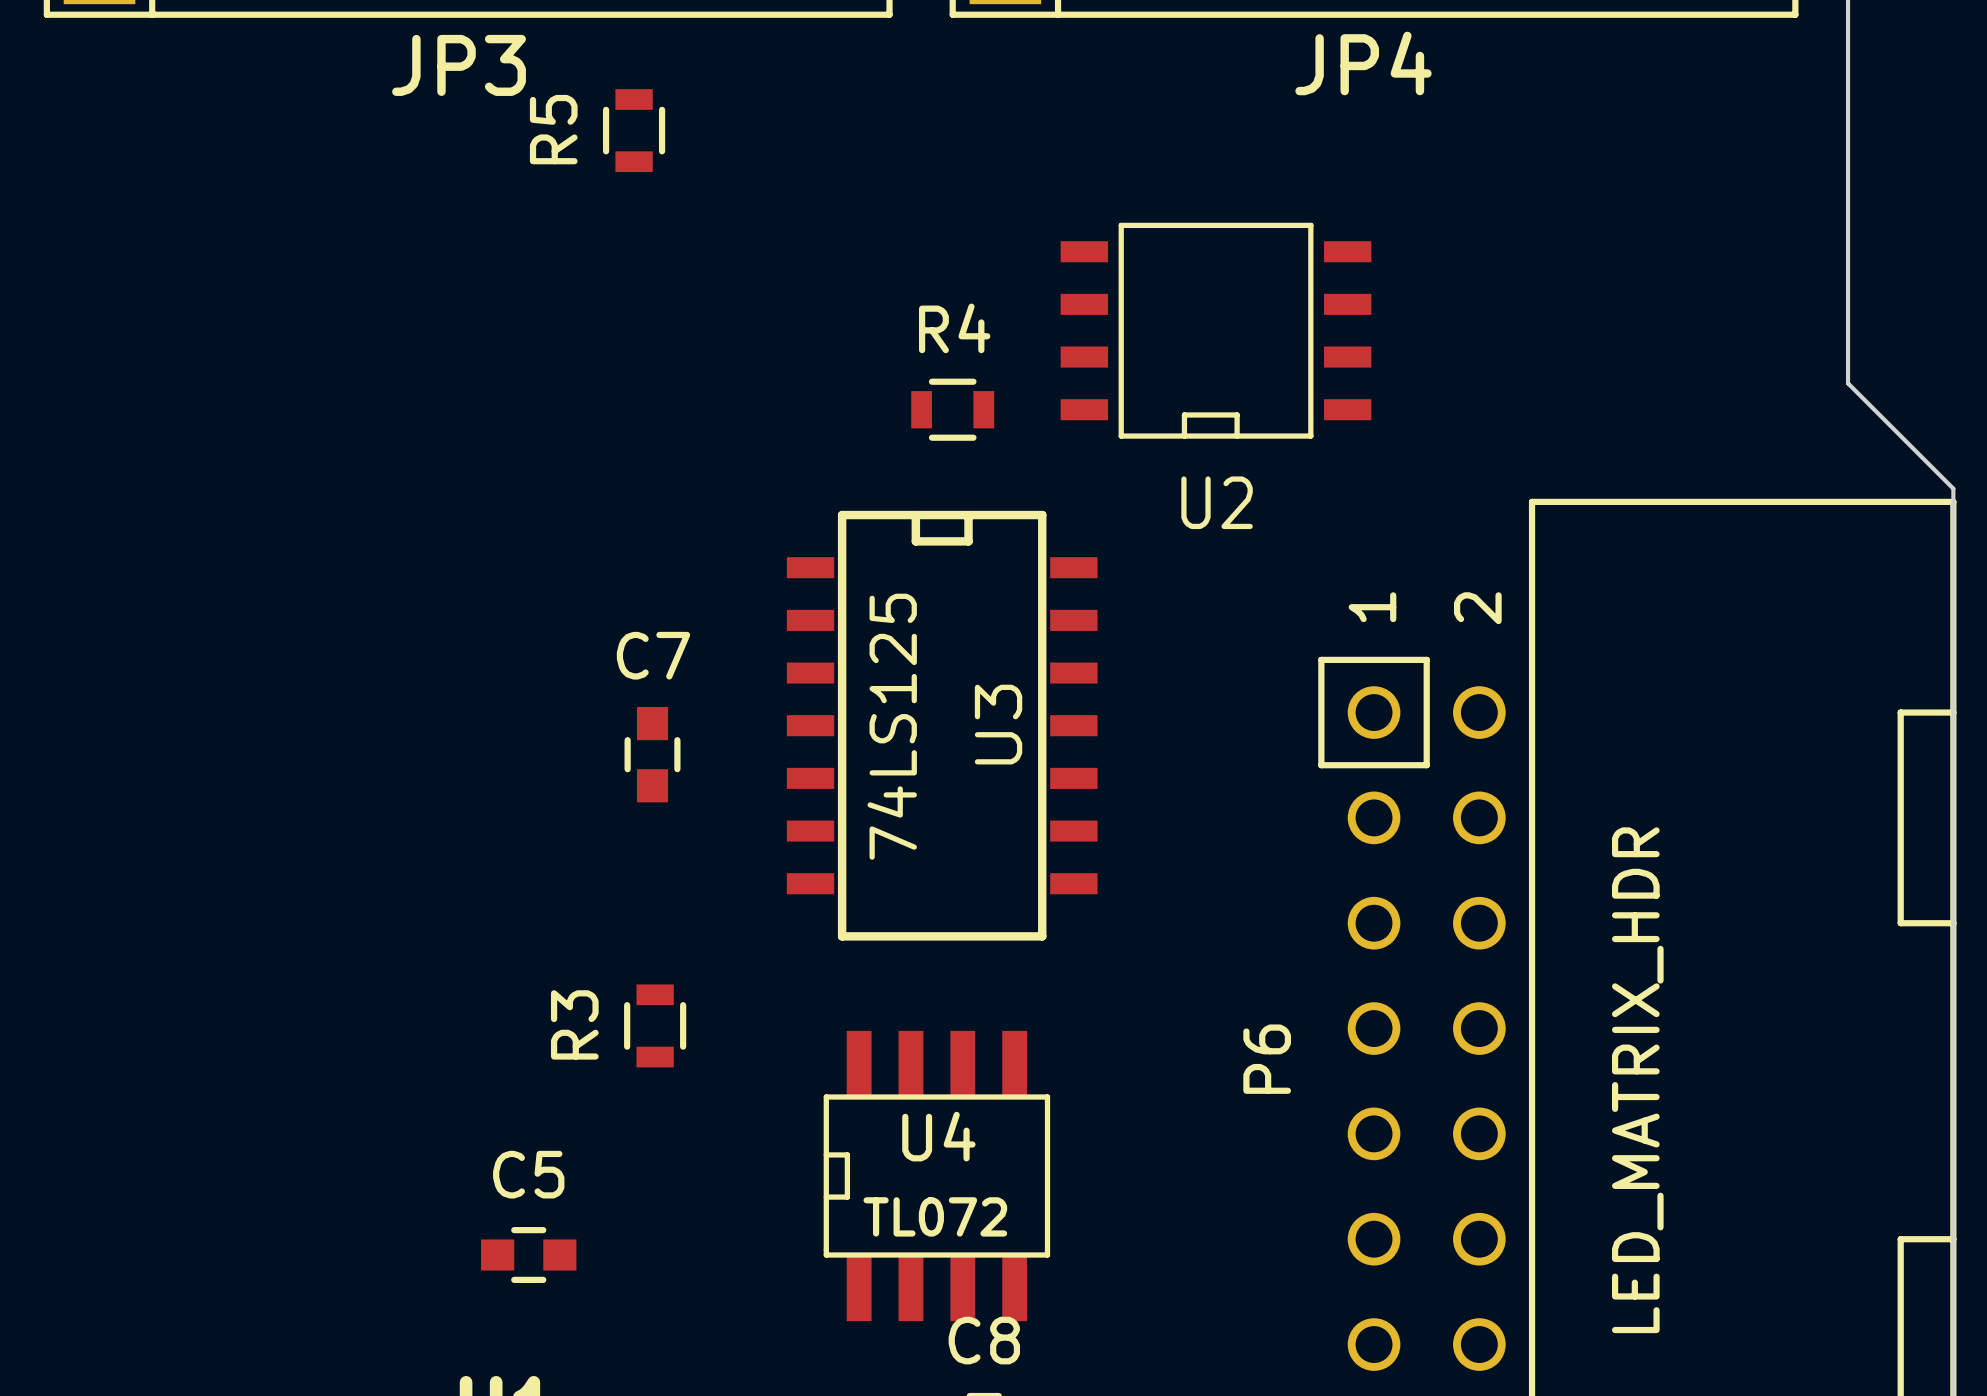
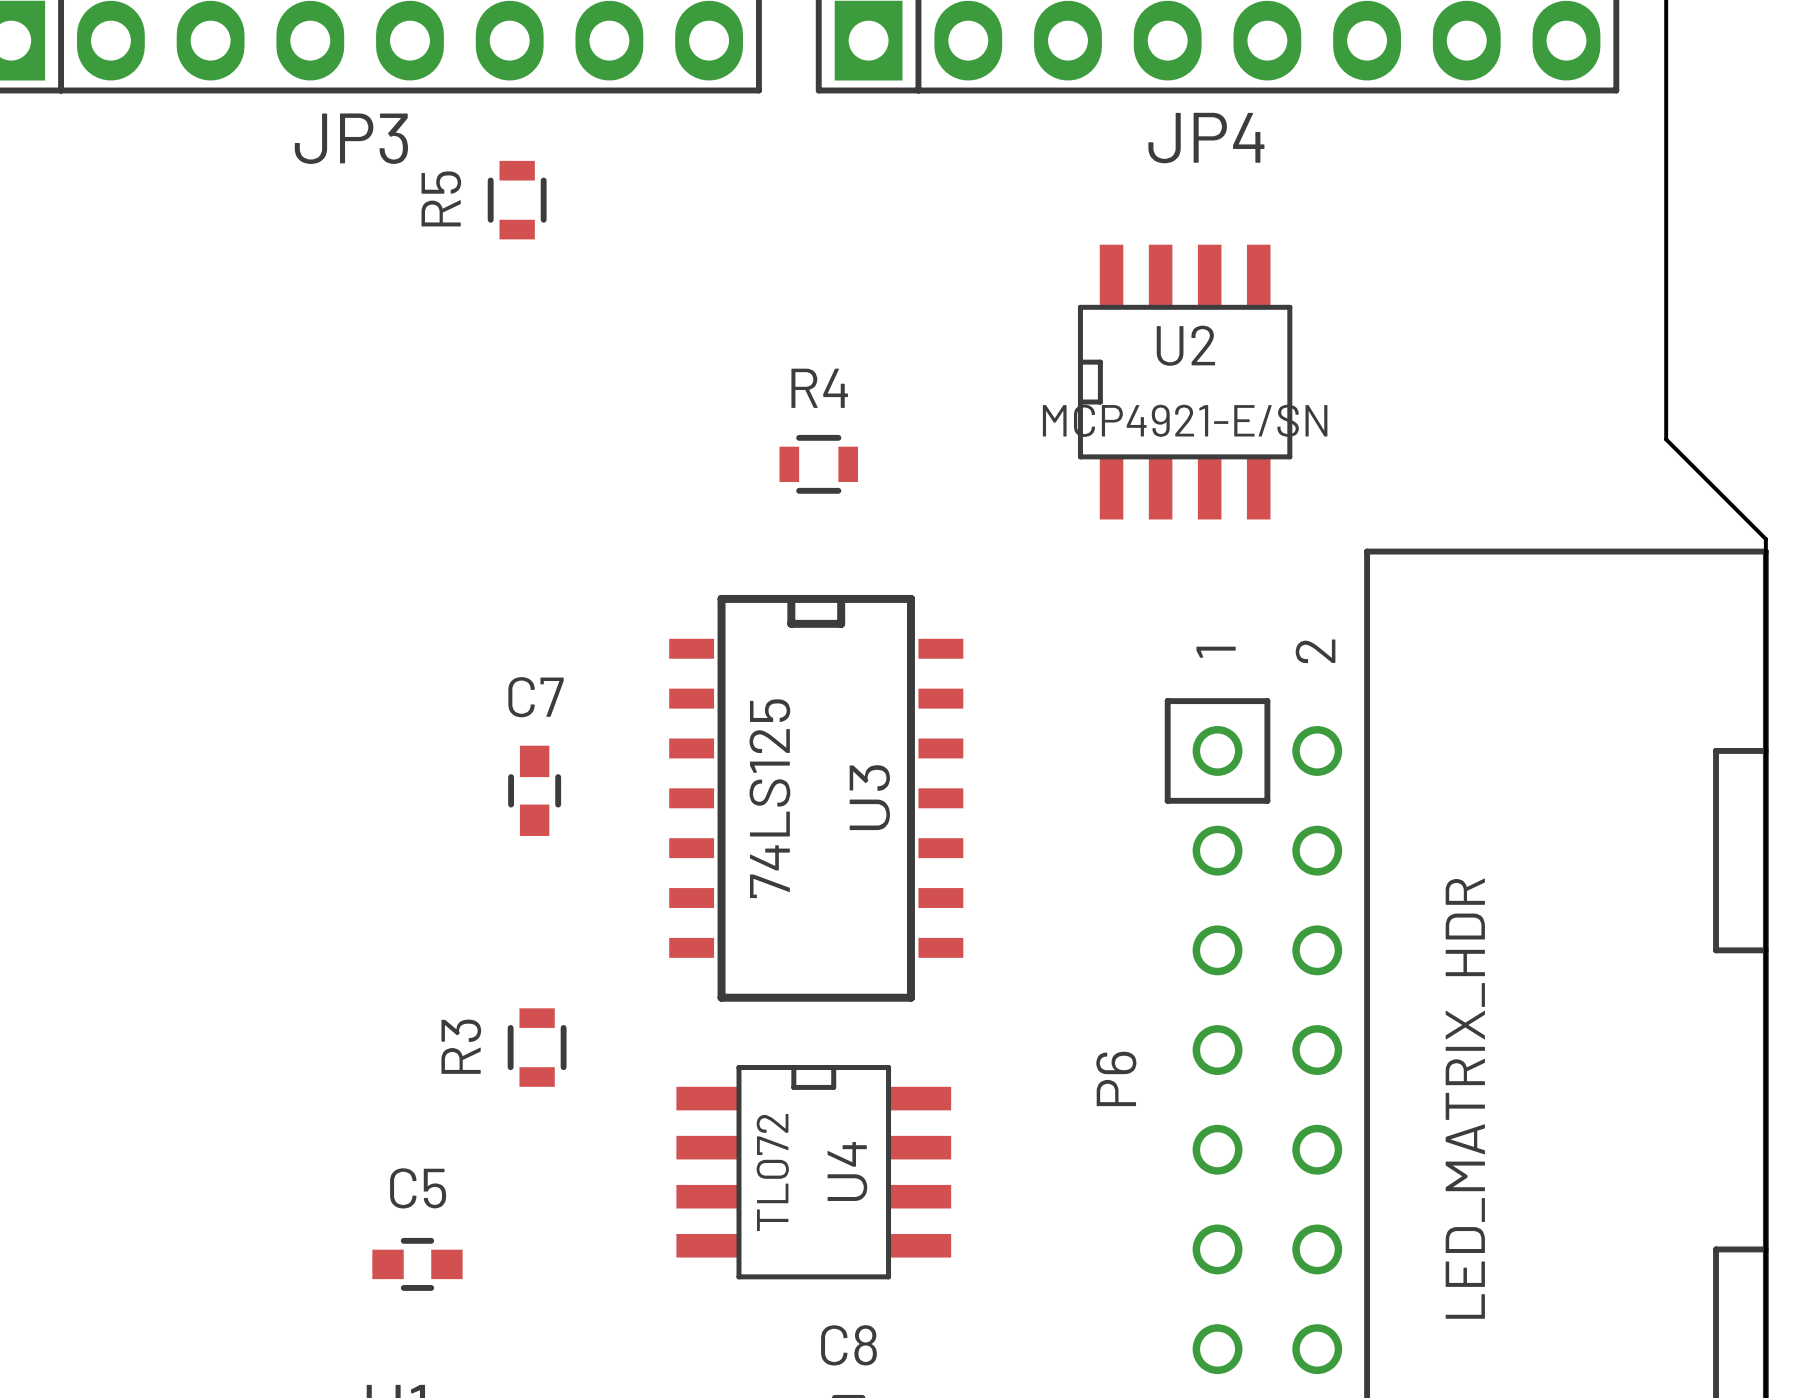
U2 footprint: [1060, 222, 1372, 439] -> [1077, 244, 1293, 520]
U2 value: none -> MCP4921-E/SN (1185, 420)
U2 name position: U2 (1217, 502) -> U2 (1185, 345)
U3 position: (942, 725) -> (816, 798)
U4 rotation: 0° (936, 1176) -> 90° clockwise (813, 1172)

